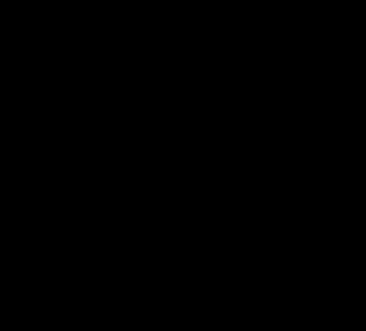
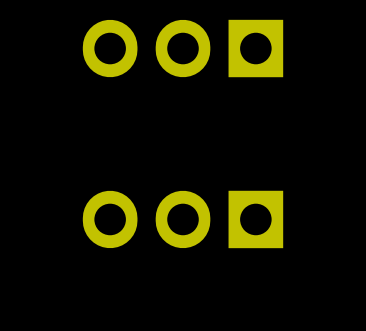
part: none -> (183, 48)
part: none -> (183, 219)

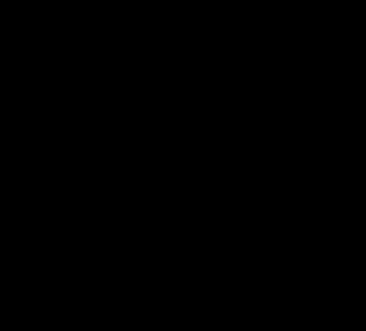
part: (183, 48) -> none
part: (183, 219) -> none

